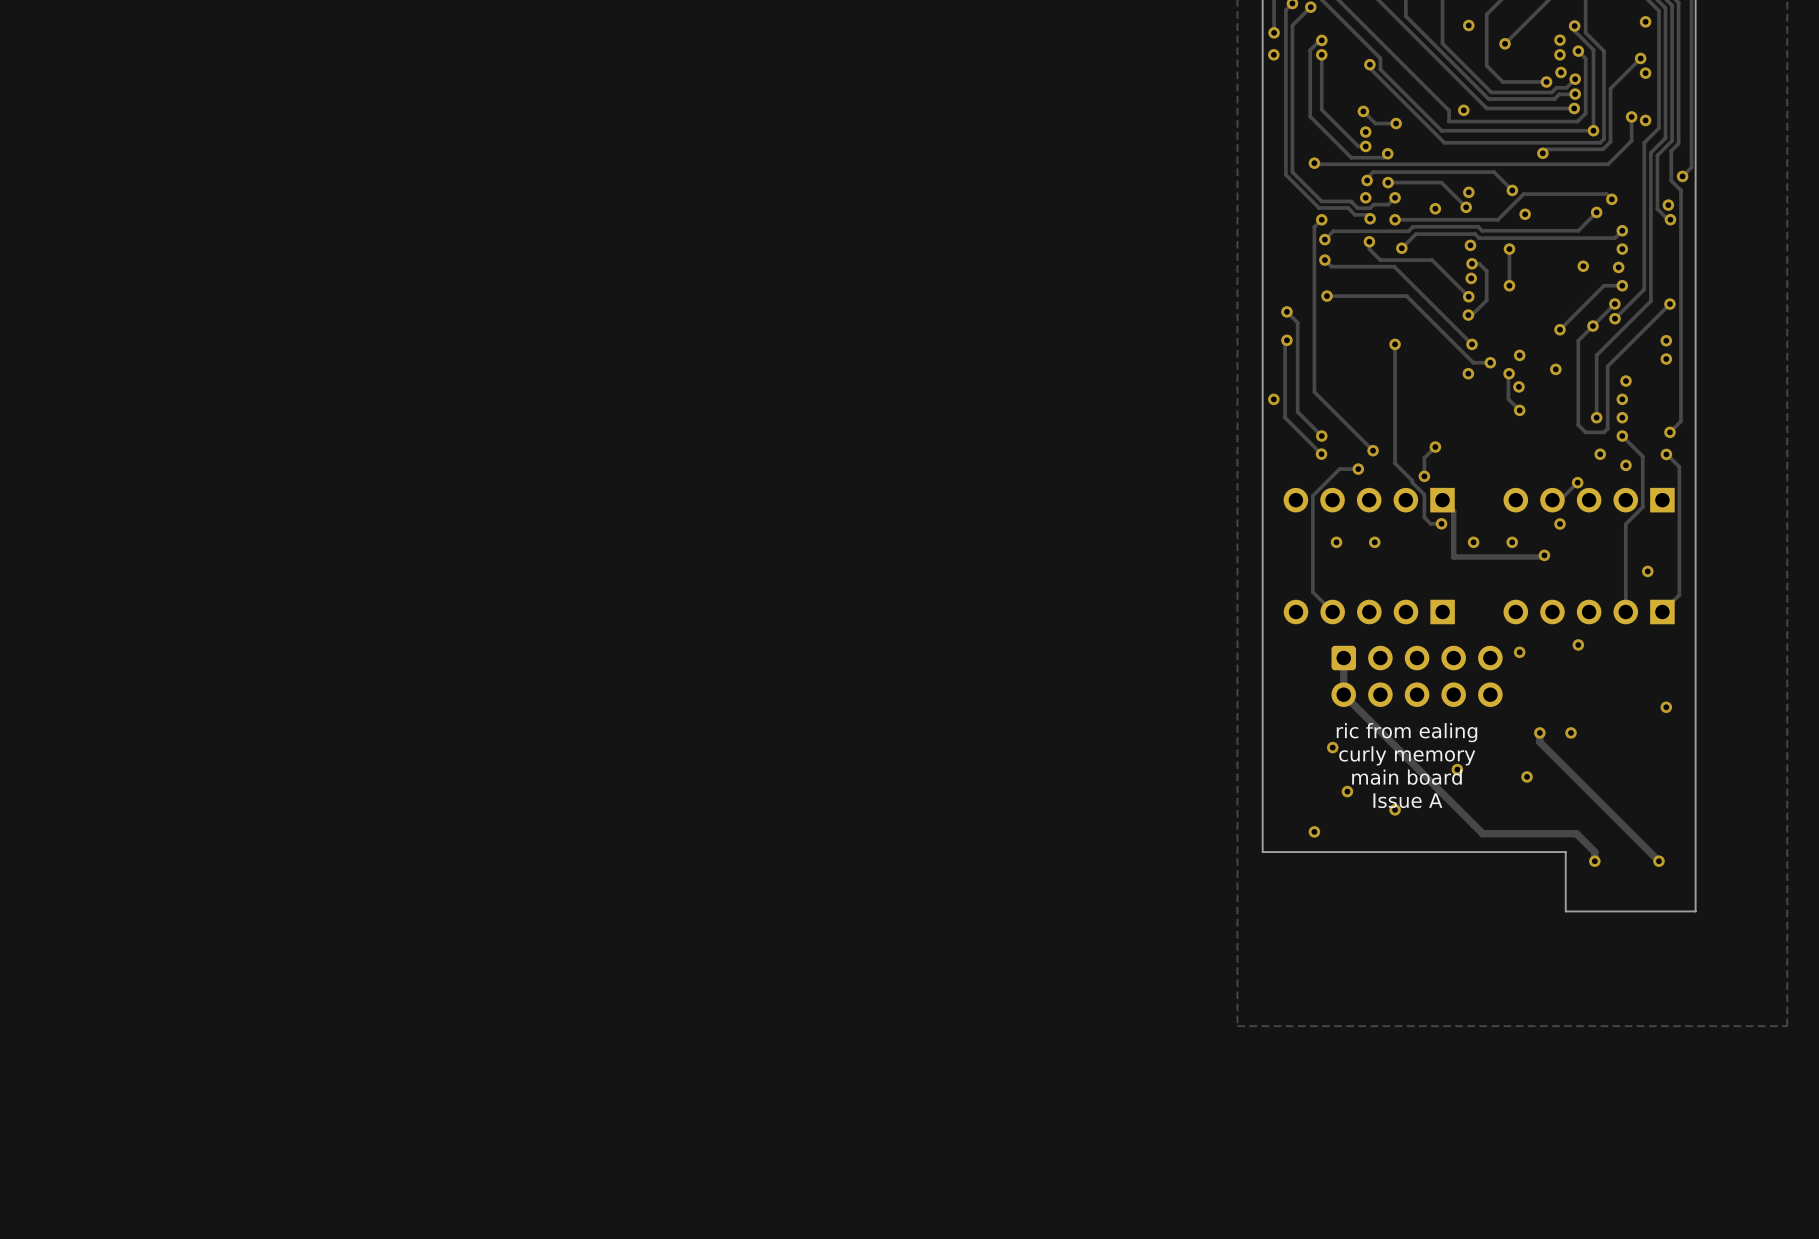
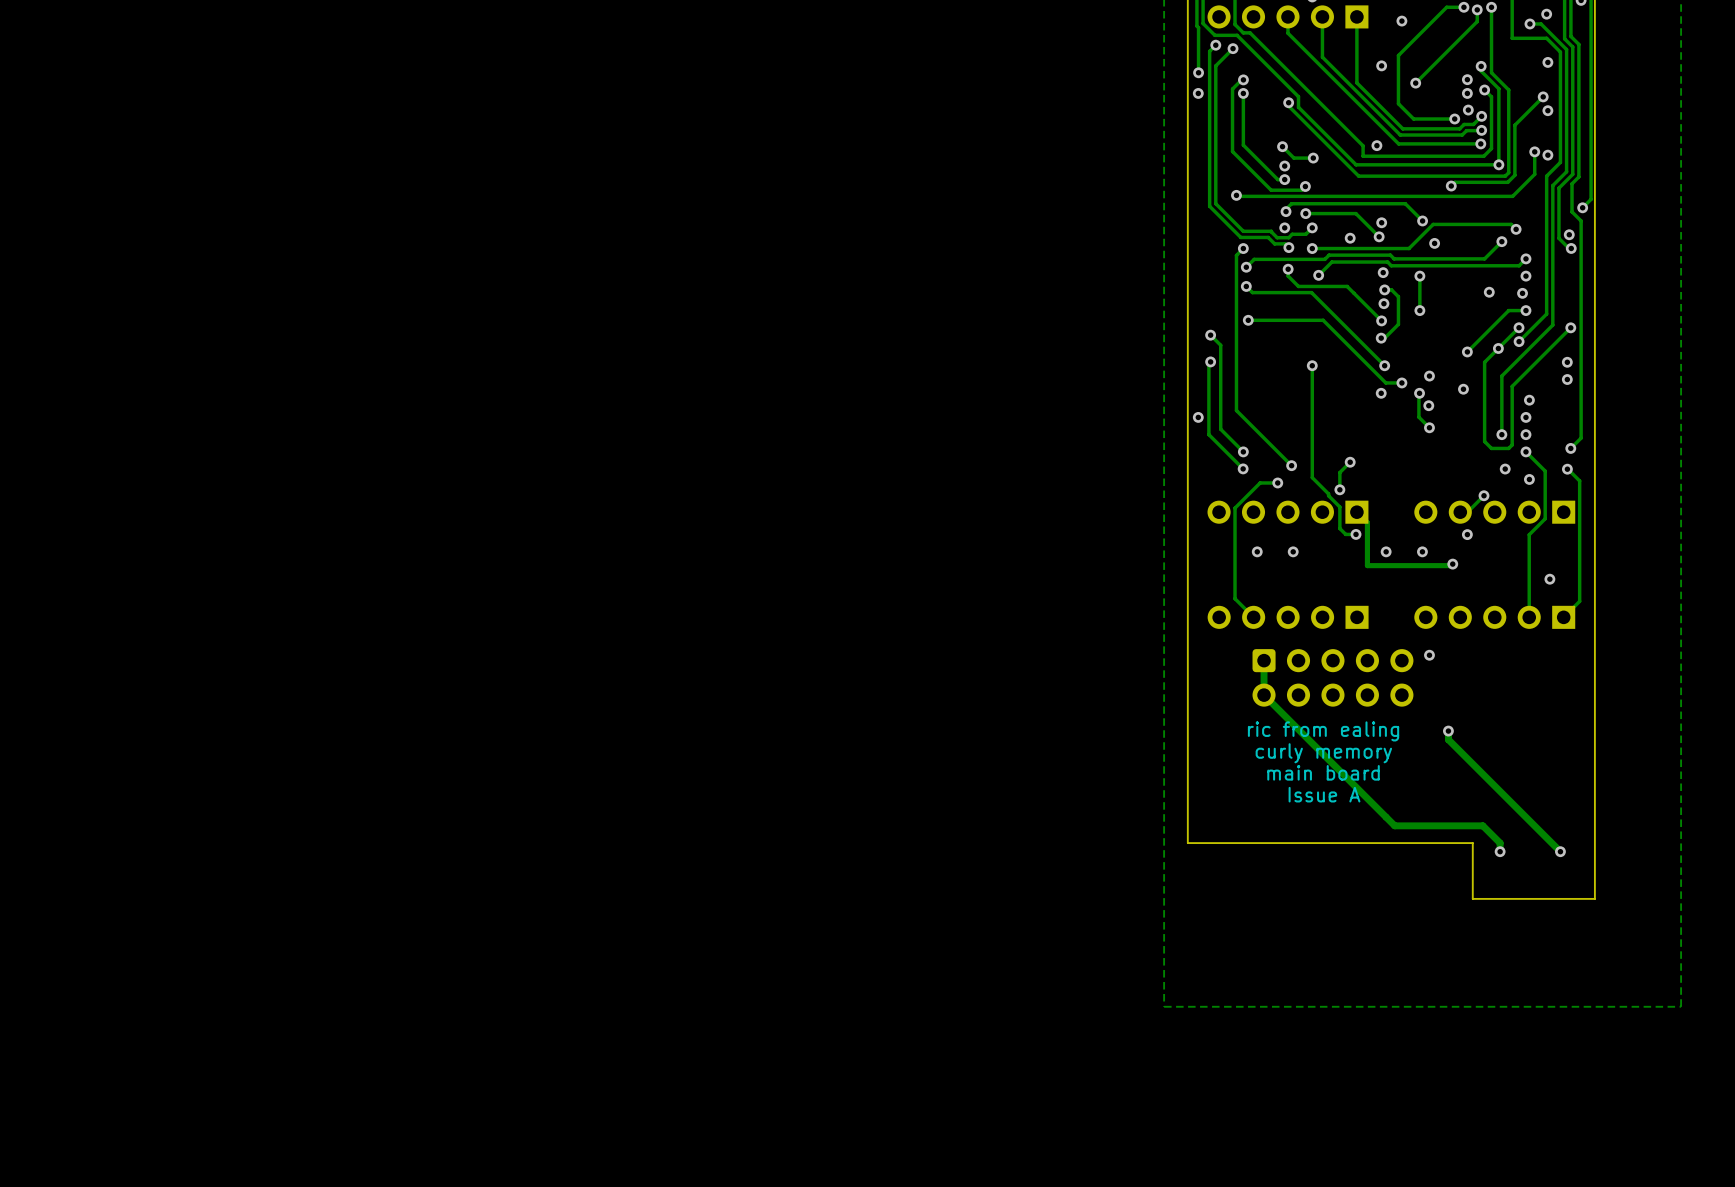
via: (1578, 644) -> none
via: (1666, 707) -> none
via: (1571, 732) -> none
via: (1332, 747) -> none
via: (1457, 769) -> none
via: (1527, 776) -> none
via: (1347, 791) -> none
via: (1395, 809) -> none
via: (1314, 831) -> none

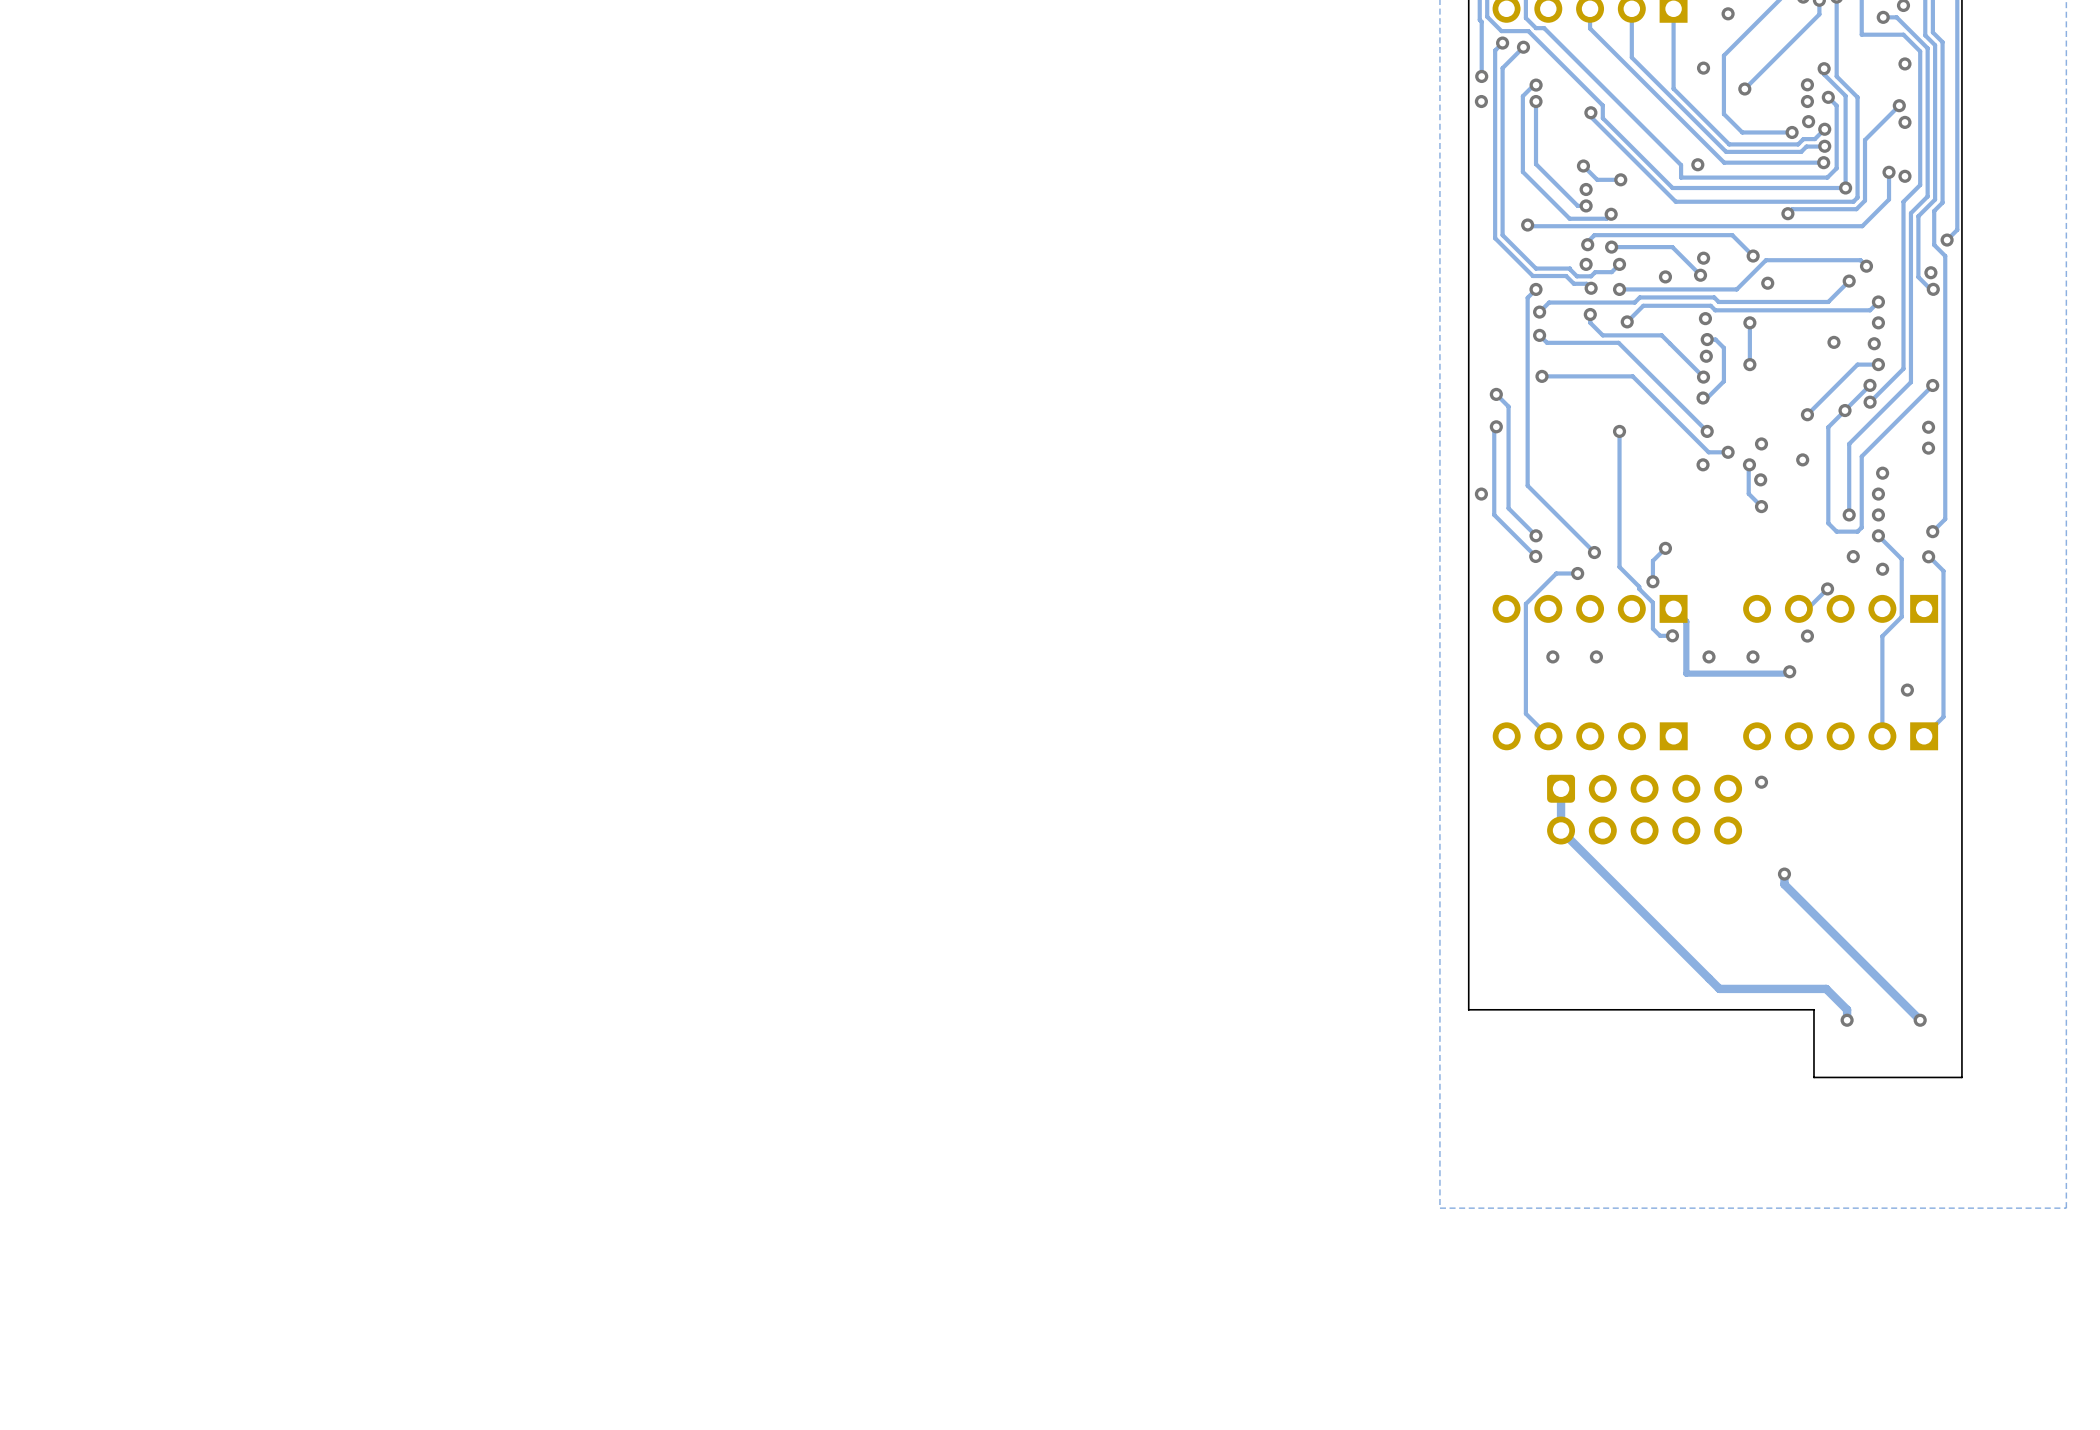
text: ric from ealing (1323, 731) -> none
text: curly memory (1323, 753) -> none
text: main board (1323, 772) -> none
text: Issue A (1324, 794) -> none

